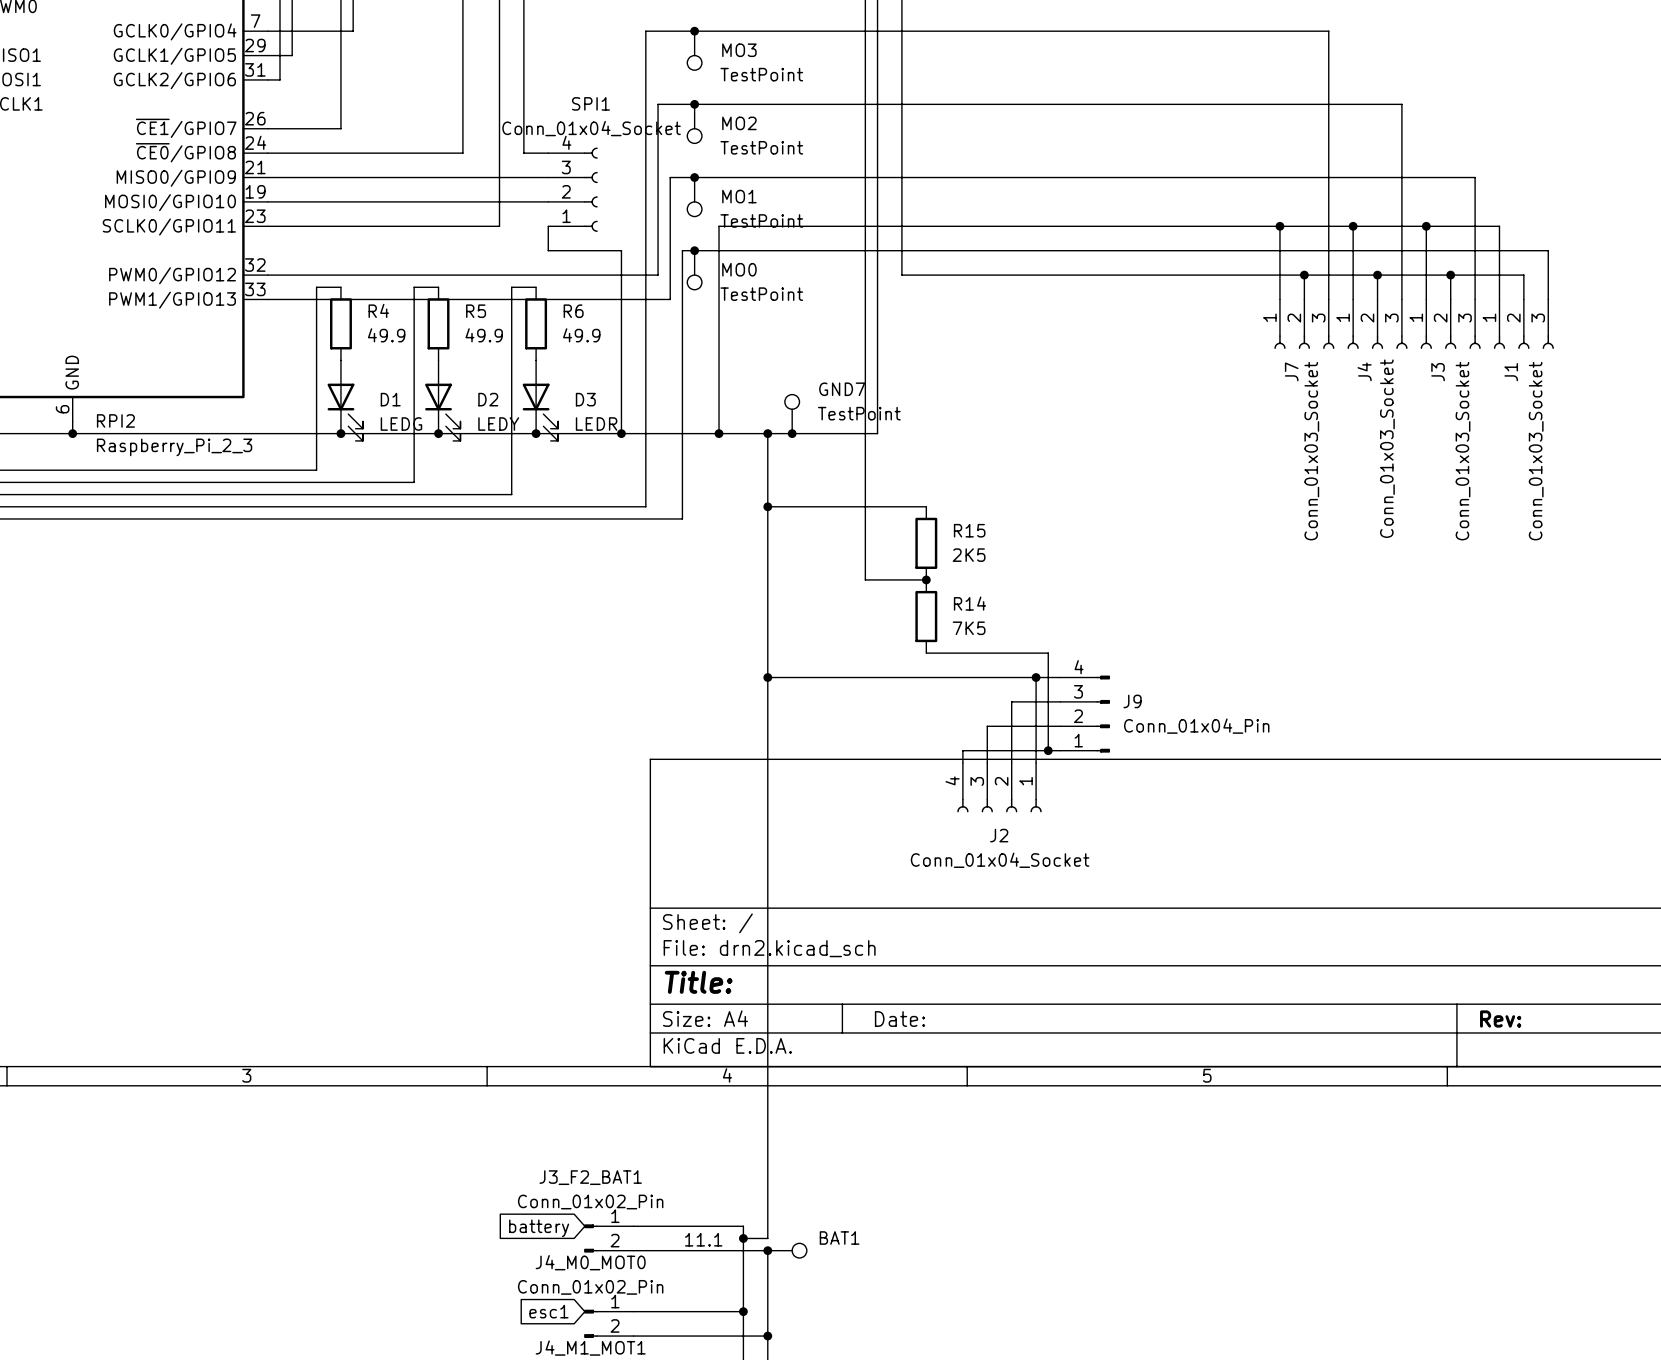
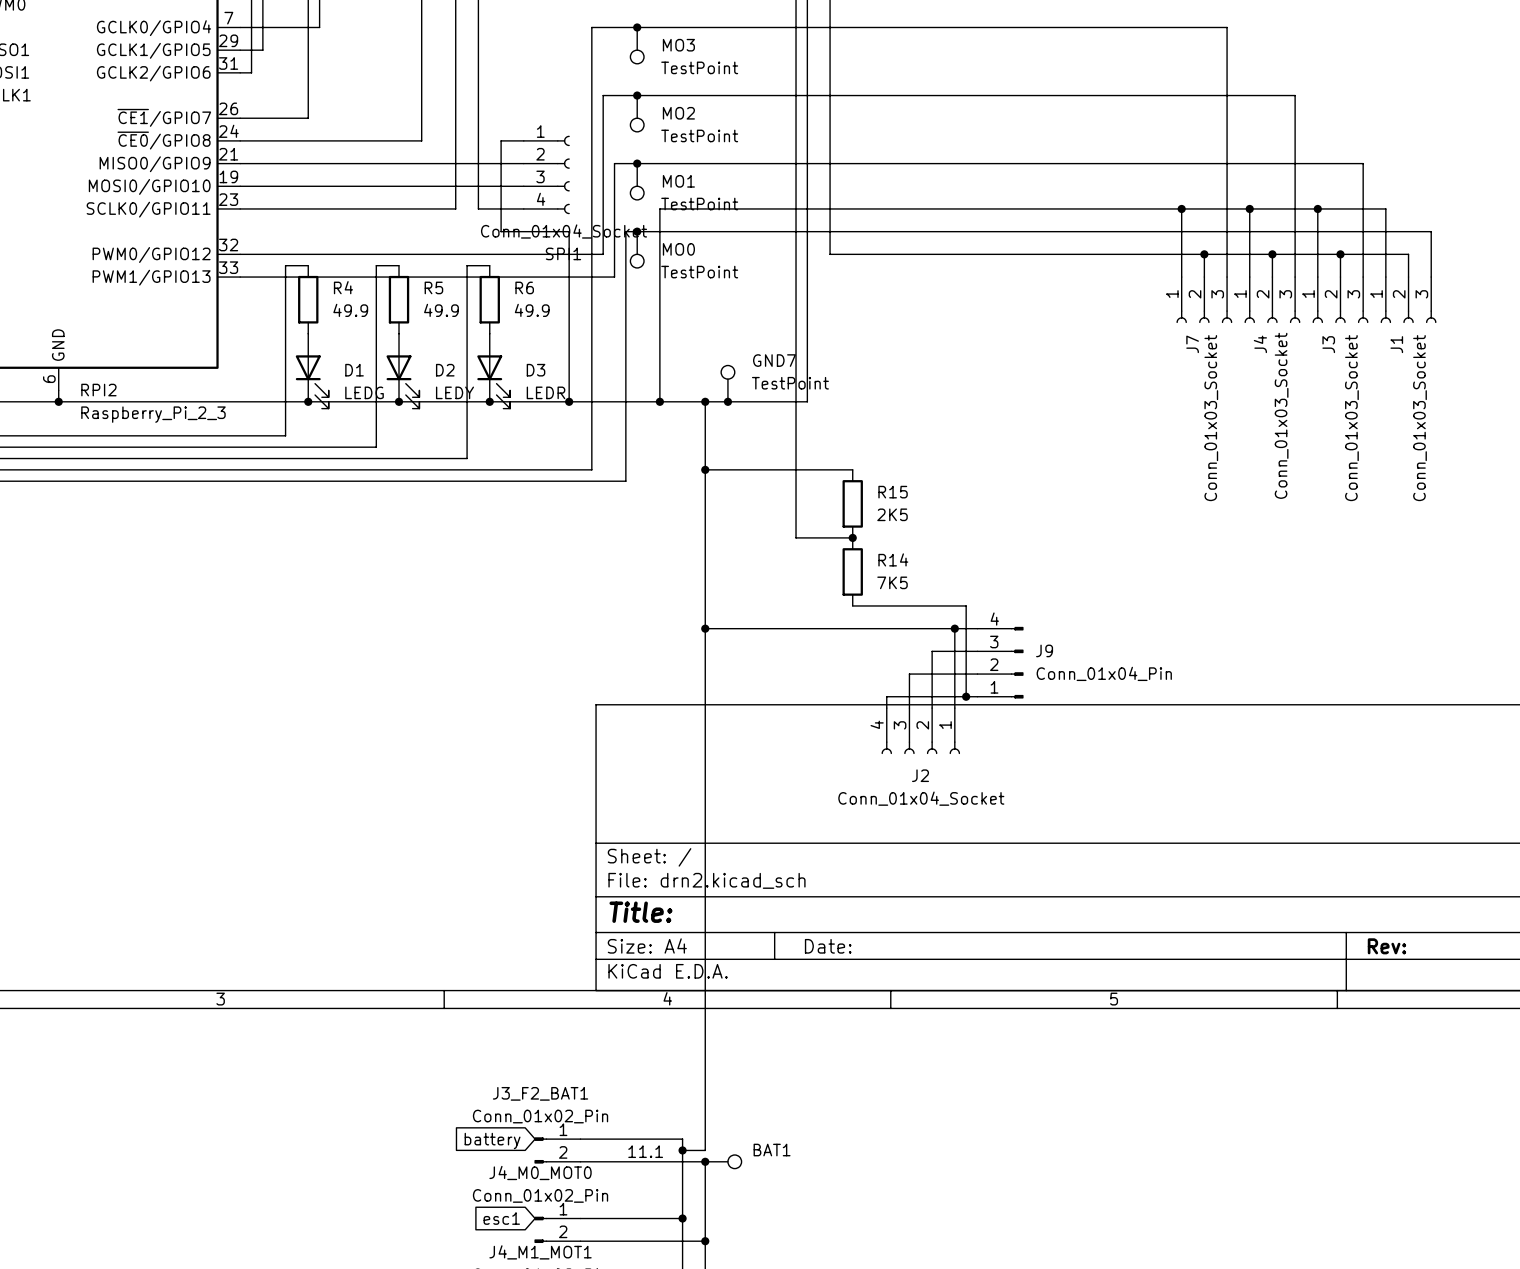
wire: (523, 153) (548, 153) -> (478, 140) (478, 208) (523, 208)
wire: none -> (523, 140) (501, 140) (501, 208)
SPI1 flip: as is (590, 189) -> up-down (563, 174)

